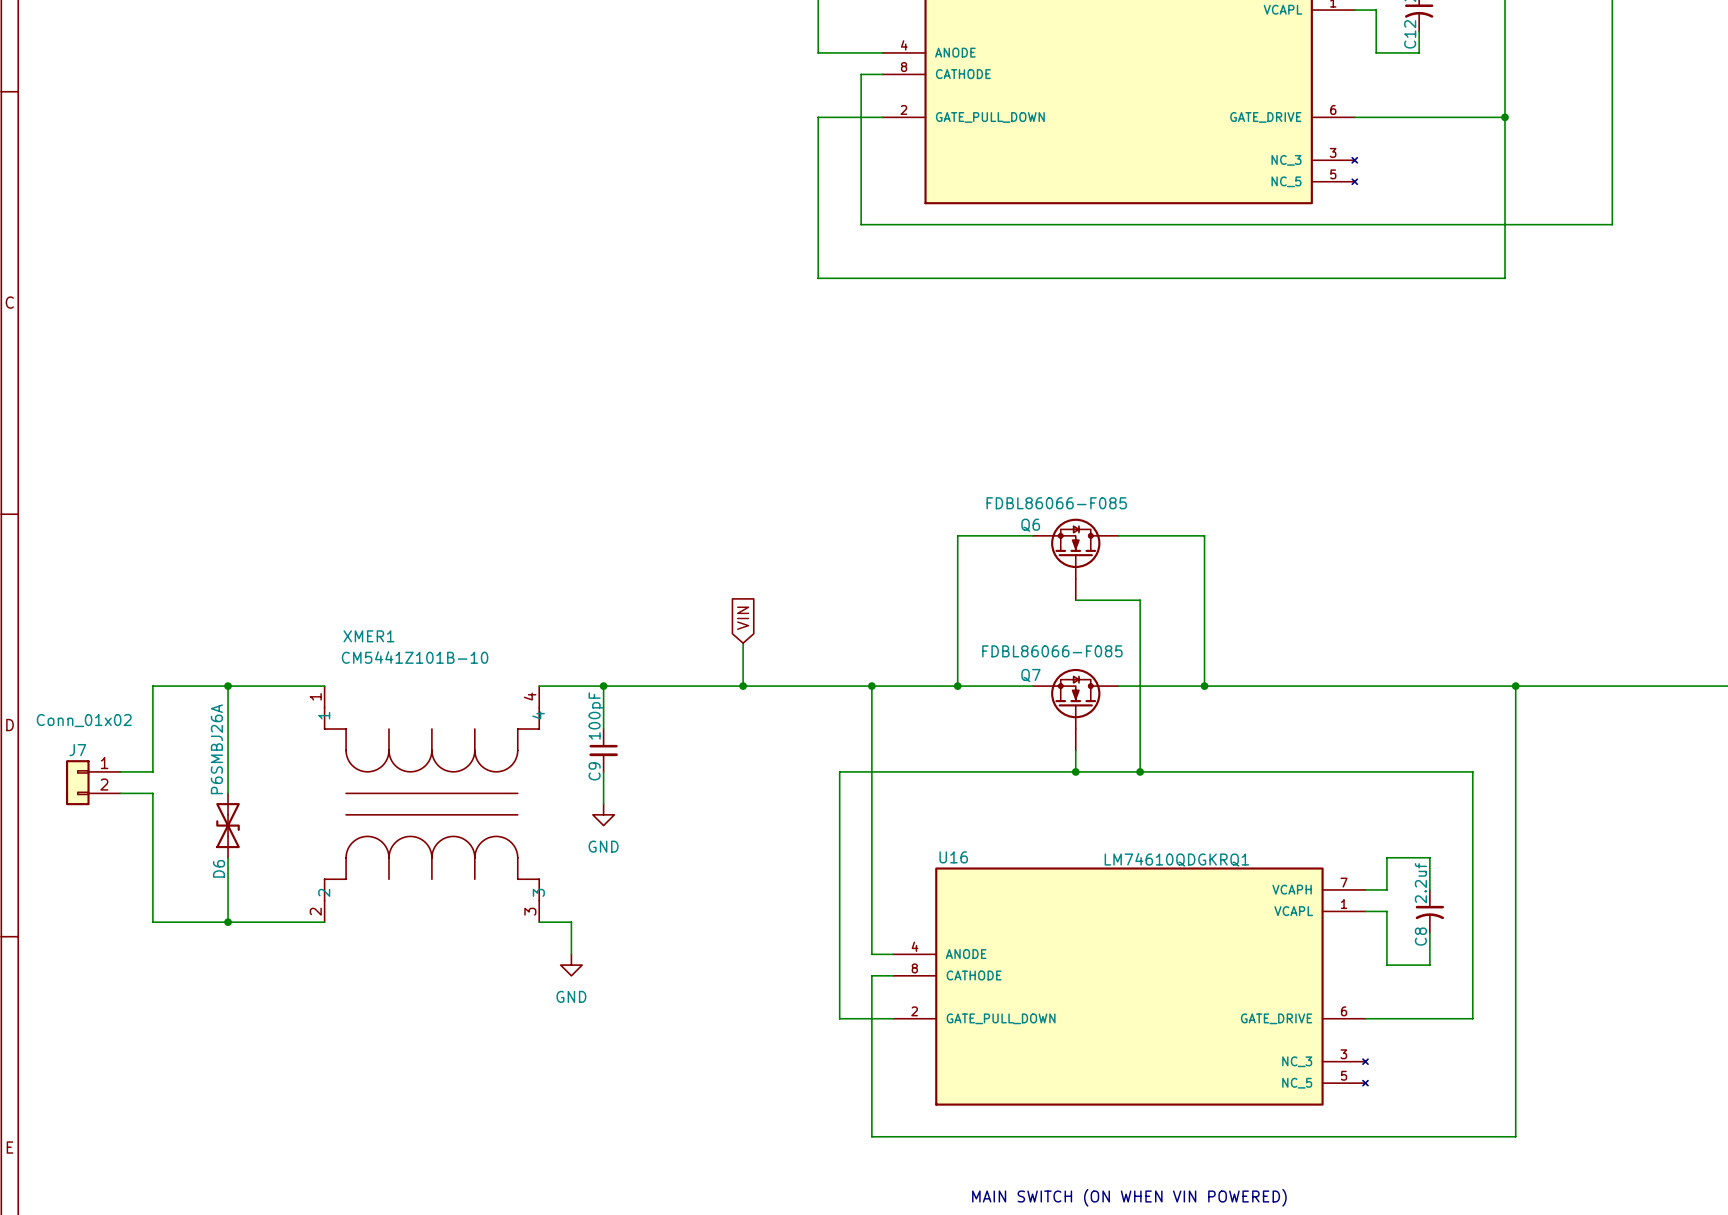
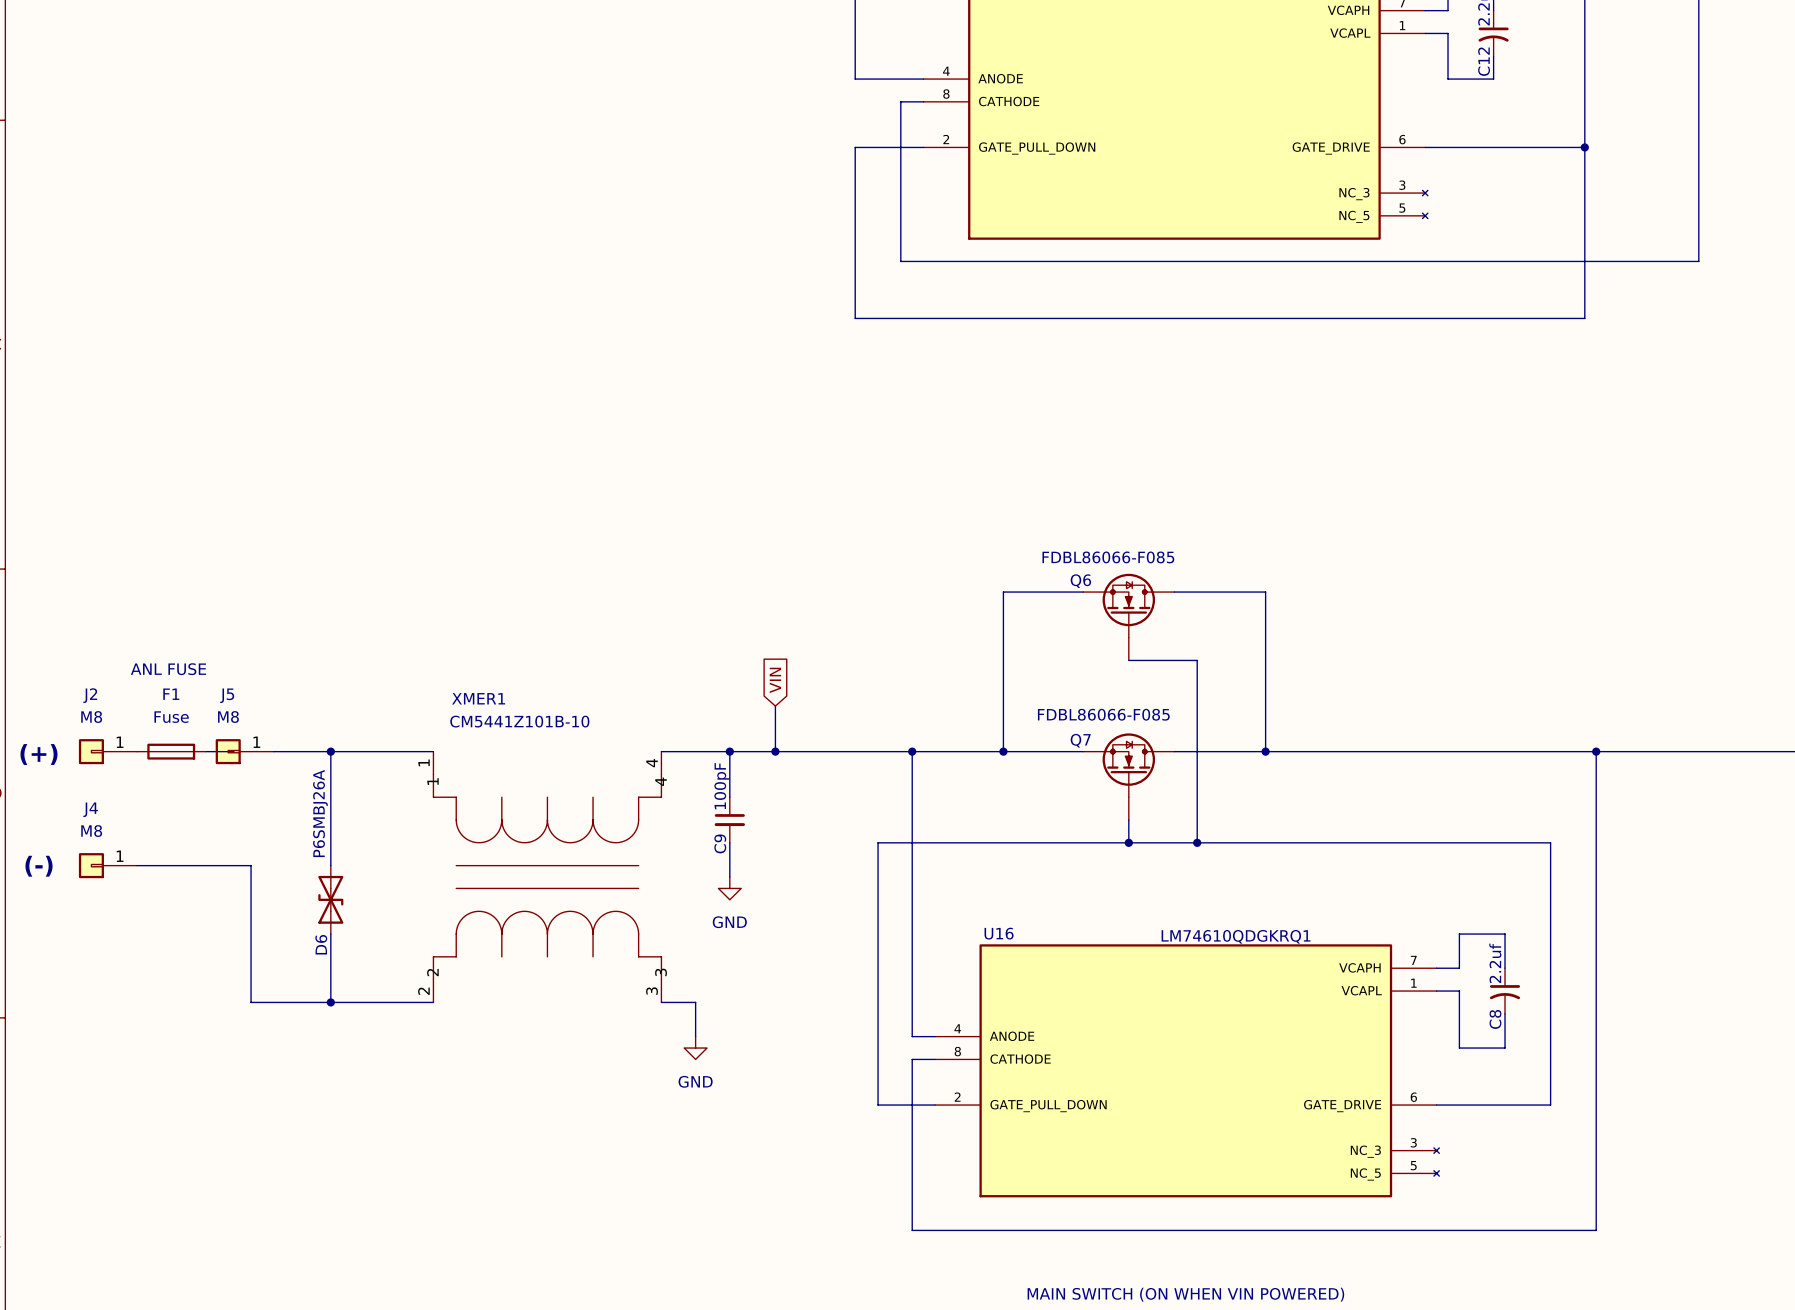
text: none -> ANL FUSE (168, 669)
J2: none -> M8 (107, 751)
F1: none -> Fuse (171, 751)
line: none -> (205, 751) (233, 751)
wire: (228, 686) (228, 793) -> none
junction: (228, 686) -> none
J5: none -> M8 (244, 751)
wire: (270, 686) (152, 686) (152, 771) (120, 771) -> none
junction: none -> (330, 751)
wire: none -> (433, 751) (330, 751) (330, 865)
wire: (539, 686) (635, 686) -> none
wire: (603, 686) (603, 729) -> (729, 751) (729, 797)
junction: (603, 686) -> none
junction: none -> (729, 751)
text: none -> (+) (39, 754)
C9 position: (603, 750) -> (729, 820)
wire: (603, 771) (603, 804) -> (729, 842) (729, 877)
J7: Conn_01x02 (93, 782) -> none
J4: none -> M8 (107, 865)
wire: (152, 793) (152, 922) (249, 922) -> (148, 865) (251, 865) (251, 1002)
text: none -> (-) (39, 866)
XMER1 position: (431, 804) -> (547, 877)
power symbol: GND (603, 814) -> none
power symbol: none -> GND (729, 888)
D6 position: (228, 825) -> (330, 899)
wire: (228, 857) (228, 922) -> none
wire: none -> (330, 934) (330, 1002) (433, 1002)
junction: (228, 922) -> none
junction: none -> (330, 1002)
wire: (539, 922) (571, 922) (571, 954) -> (661, 1002) (695, 1002) (695, 1036)
power symbol: GND (571, 965) -> none
power symbol: none -> GND (695, 1048)

